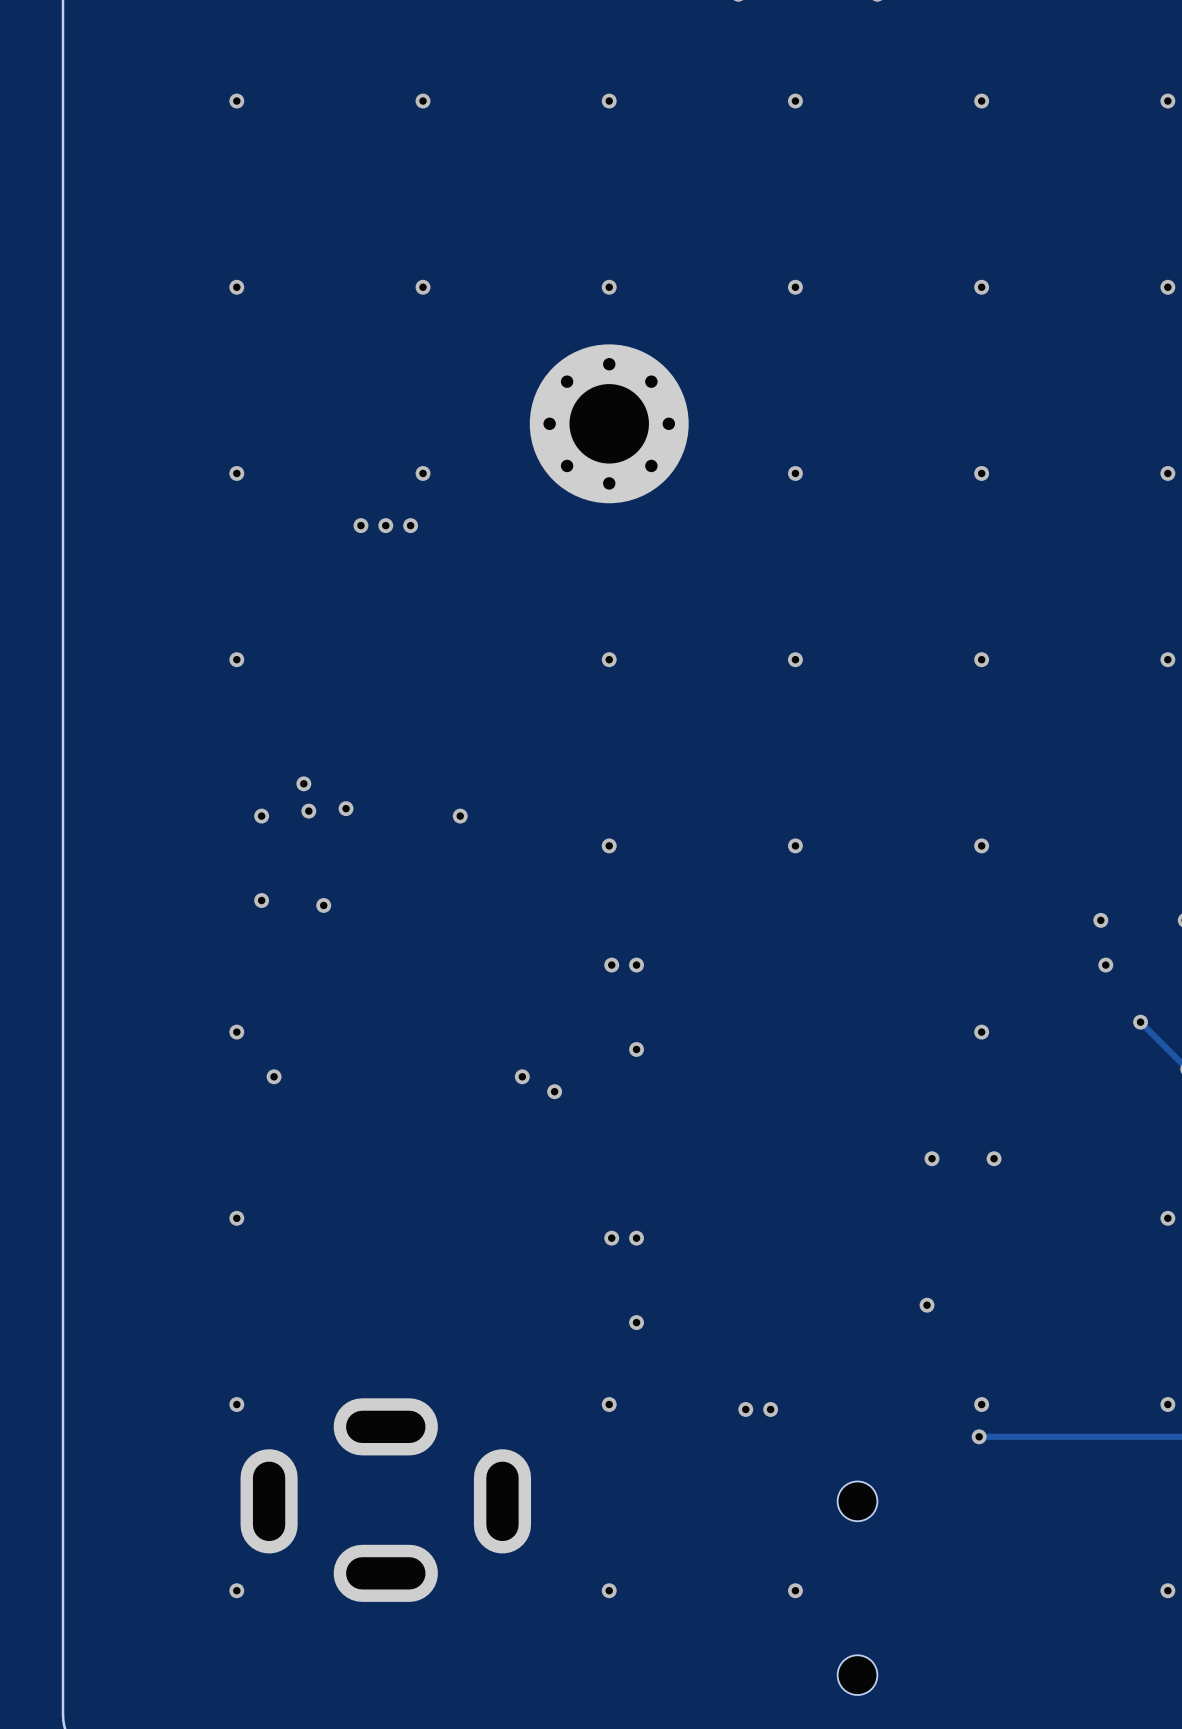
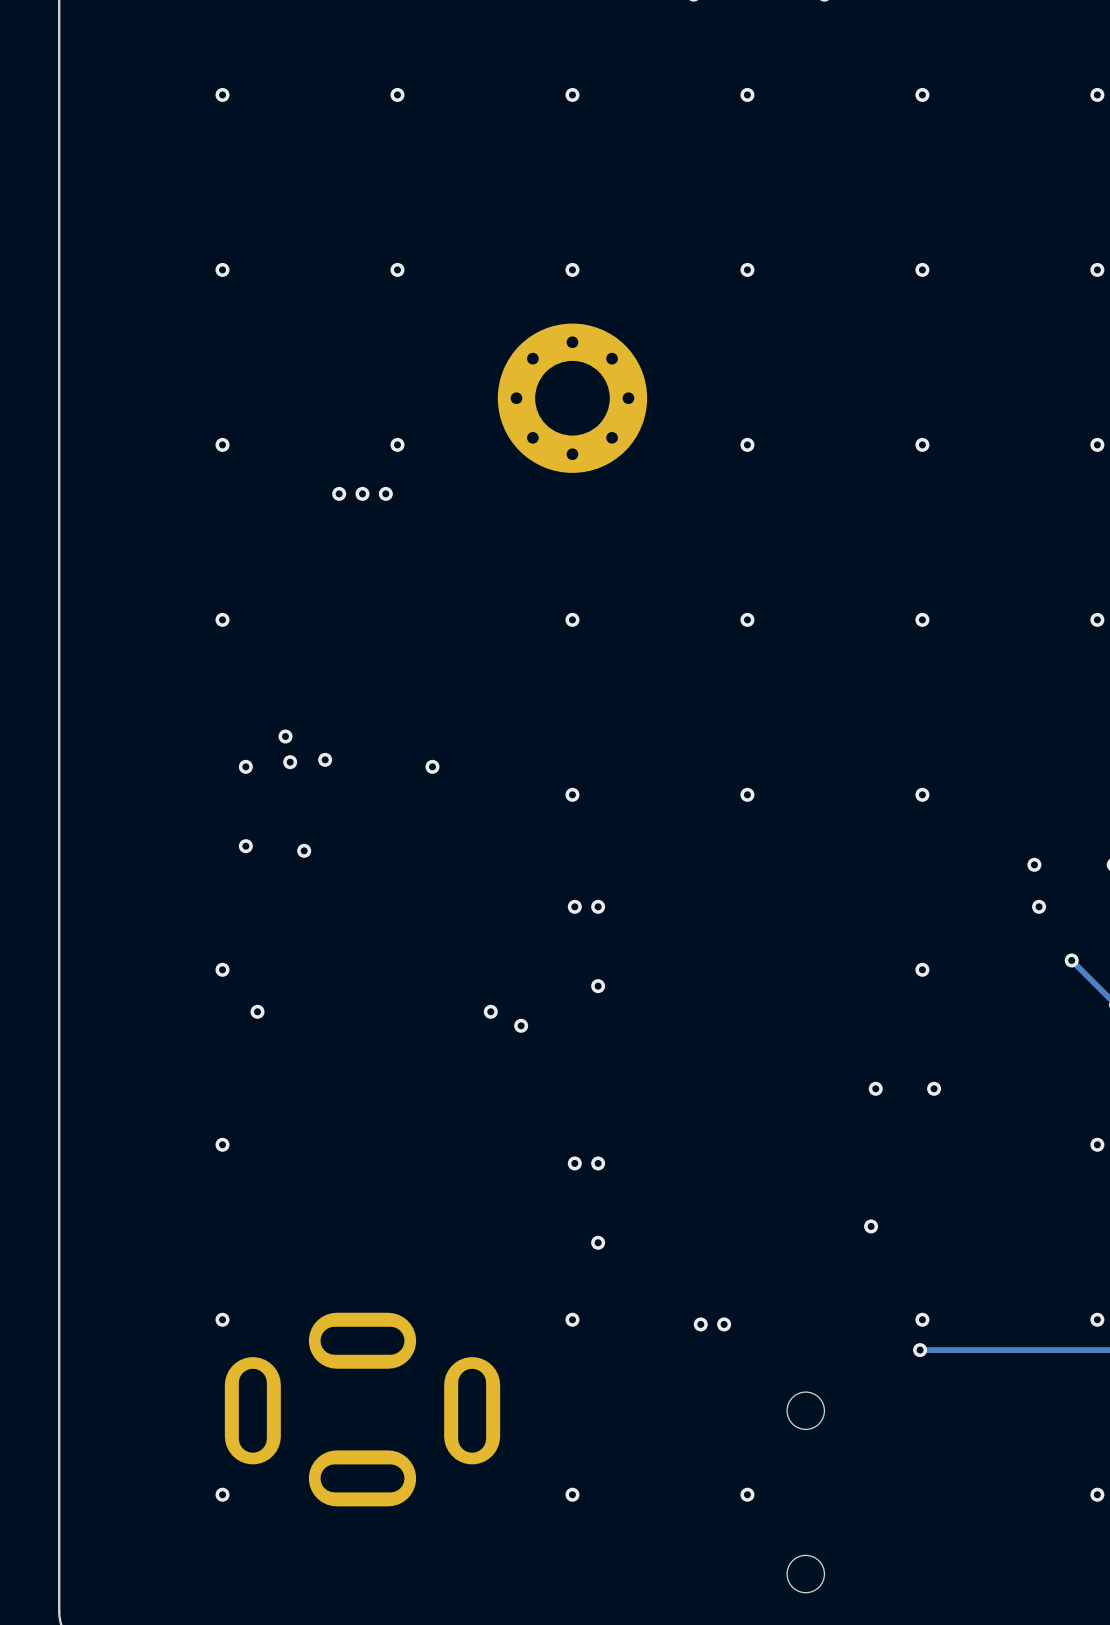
part footprint: [240, 1398, 532, 1602] -> [224, 1312, 501, 1507]

